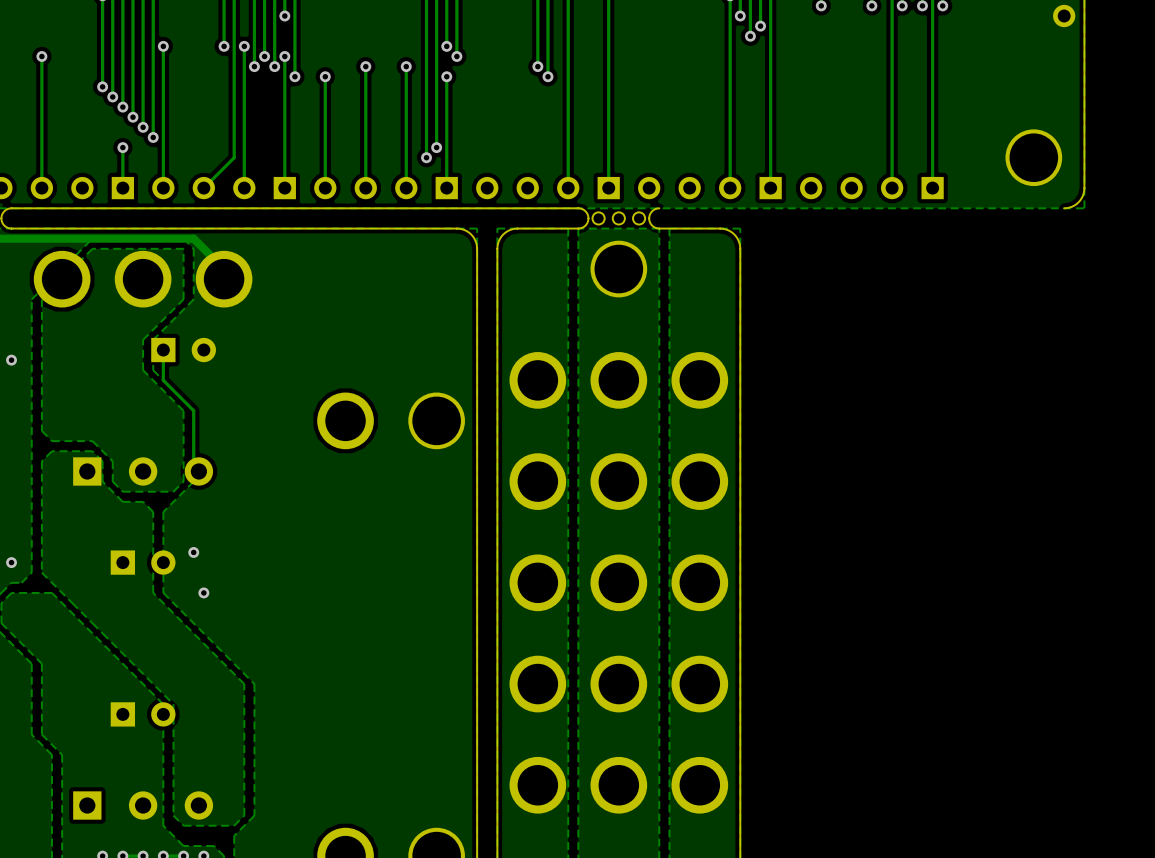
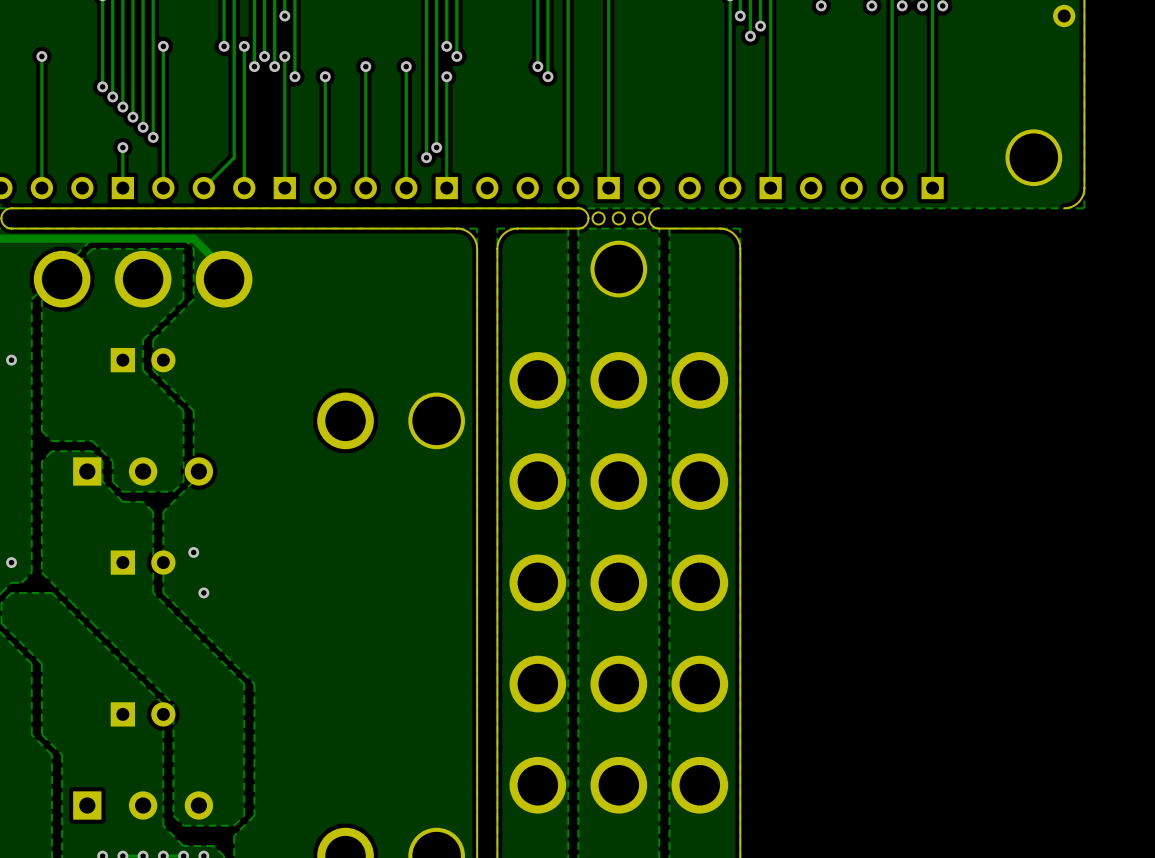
track: (163, 350) (163, 380) (193, 410) (193, 466) (198, 471) -> none
part position: (183, 350) -> (143, 360)

